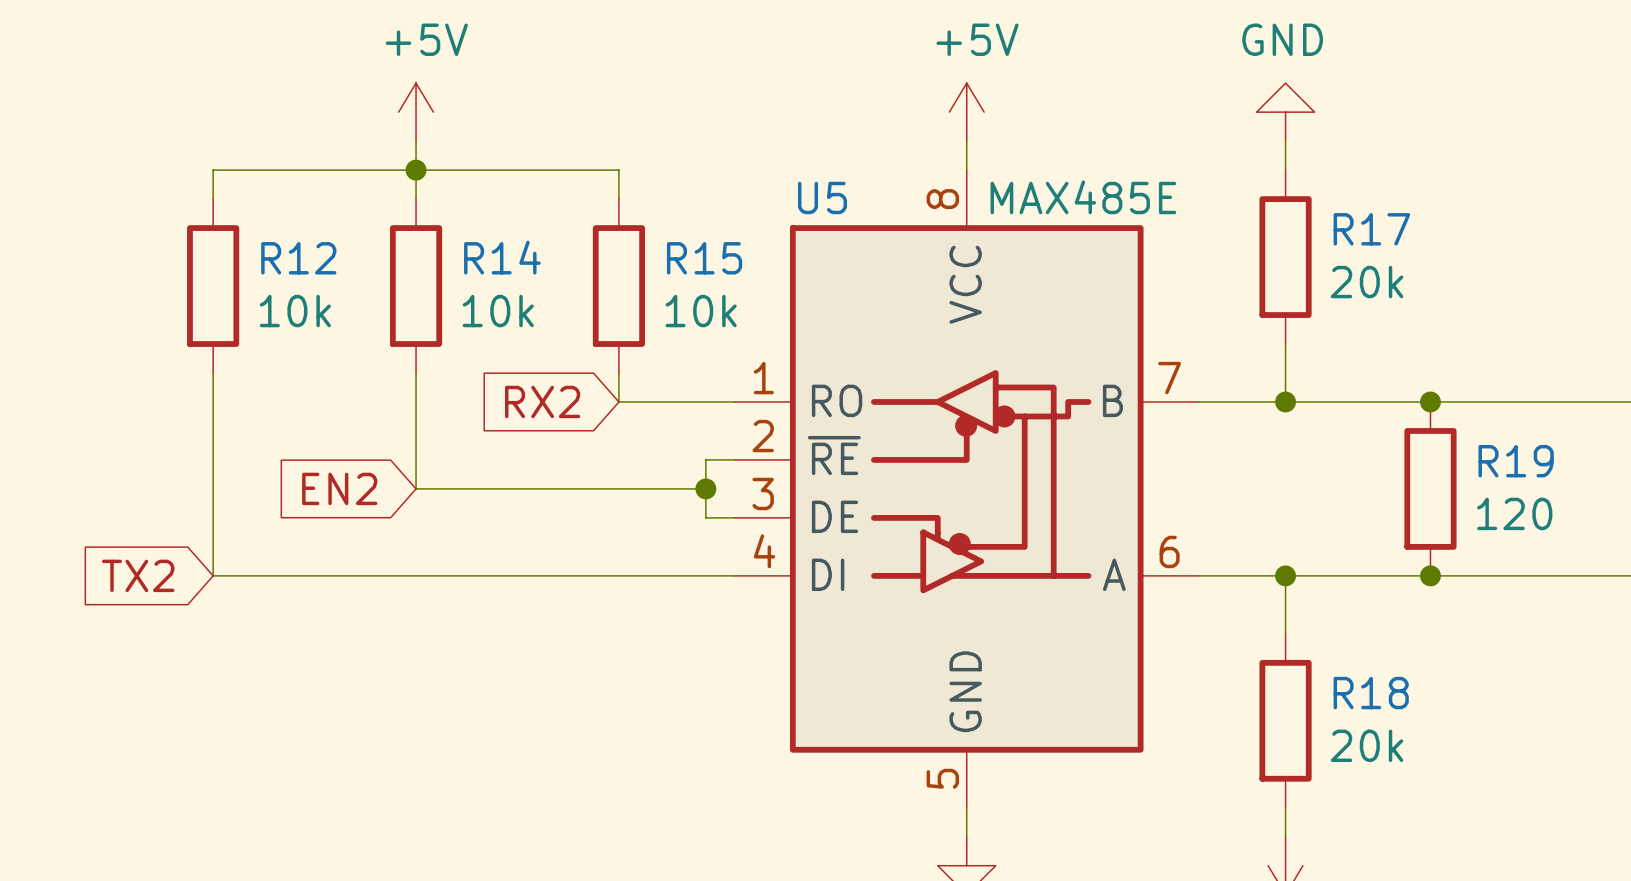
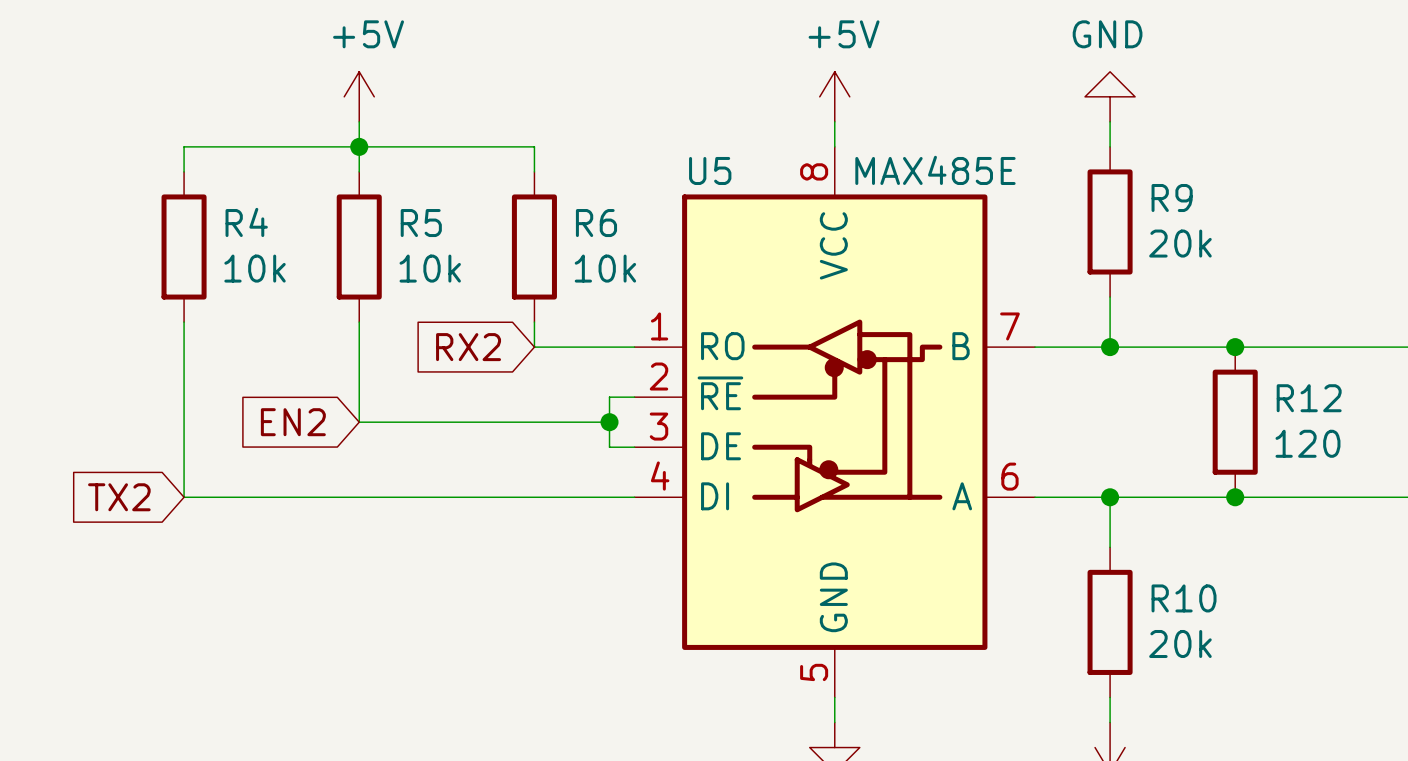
R17 name: R17 (1371, 229) -> R9 (1172, 198)
R14 name: R14 (502, 257) -> R5 (421, 223)
R12 name: R12 (298, 258) -> R4 (246, 222)
R15 name: R15 (704, 258) -> R6 (596, 223)
R19 name: R19 (1516, 461) -> R12 (1309, 398)
R18 name: R18 (1371, 693) -> R10 (1184, 598)

